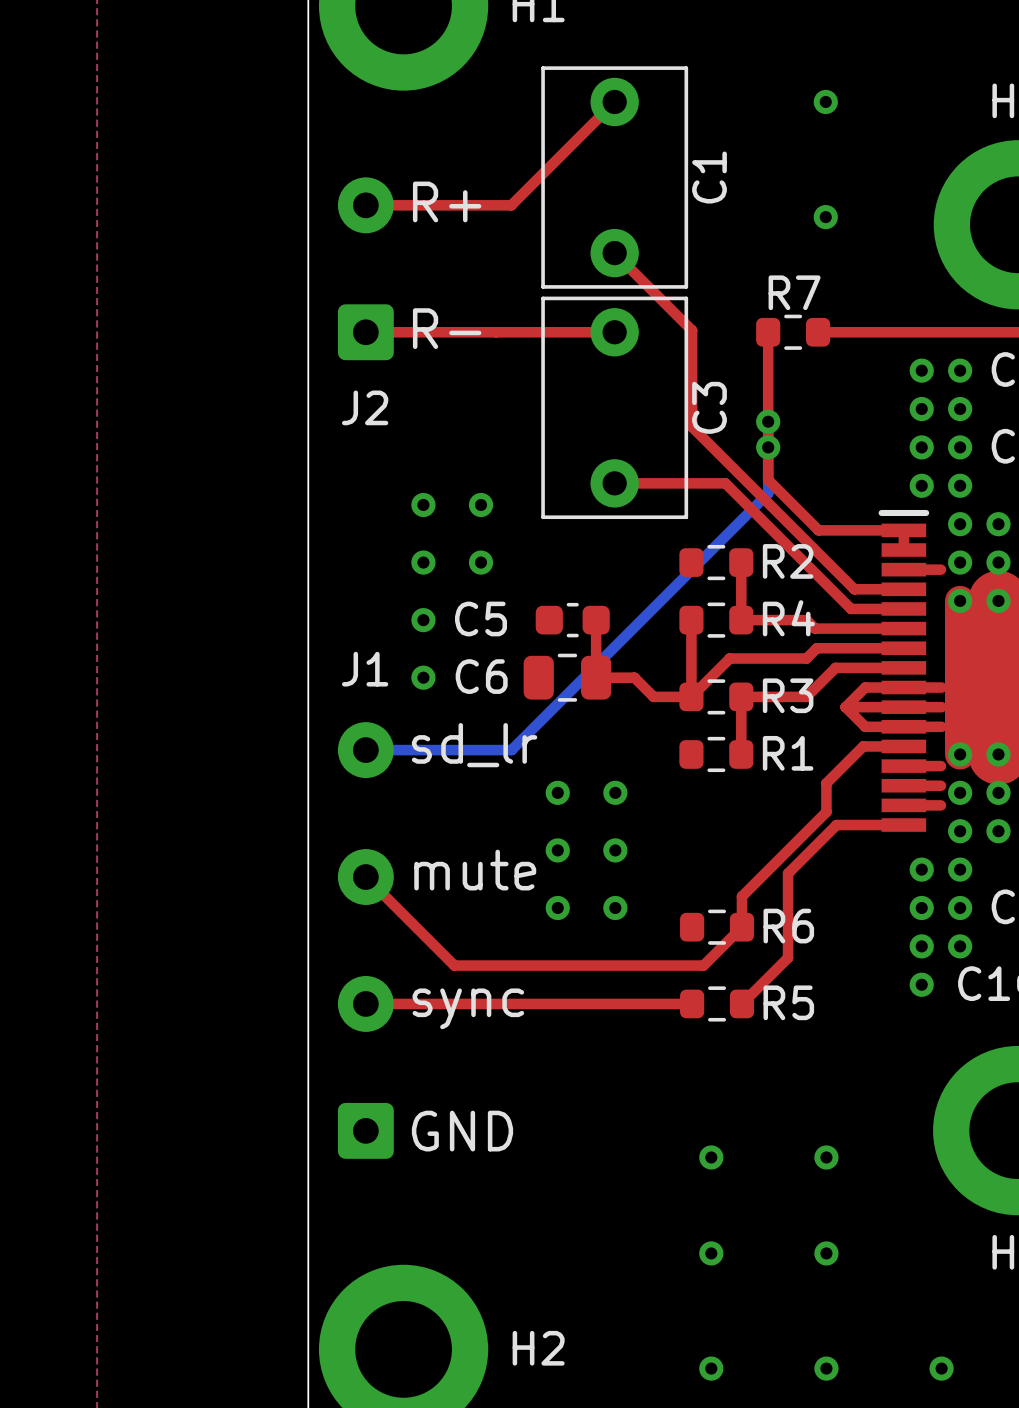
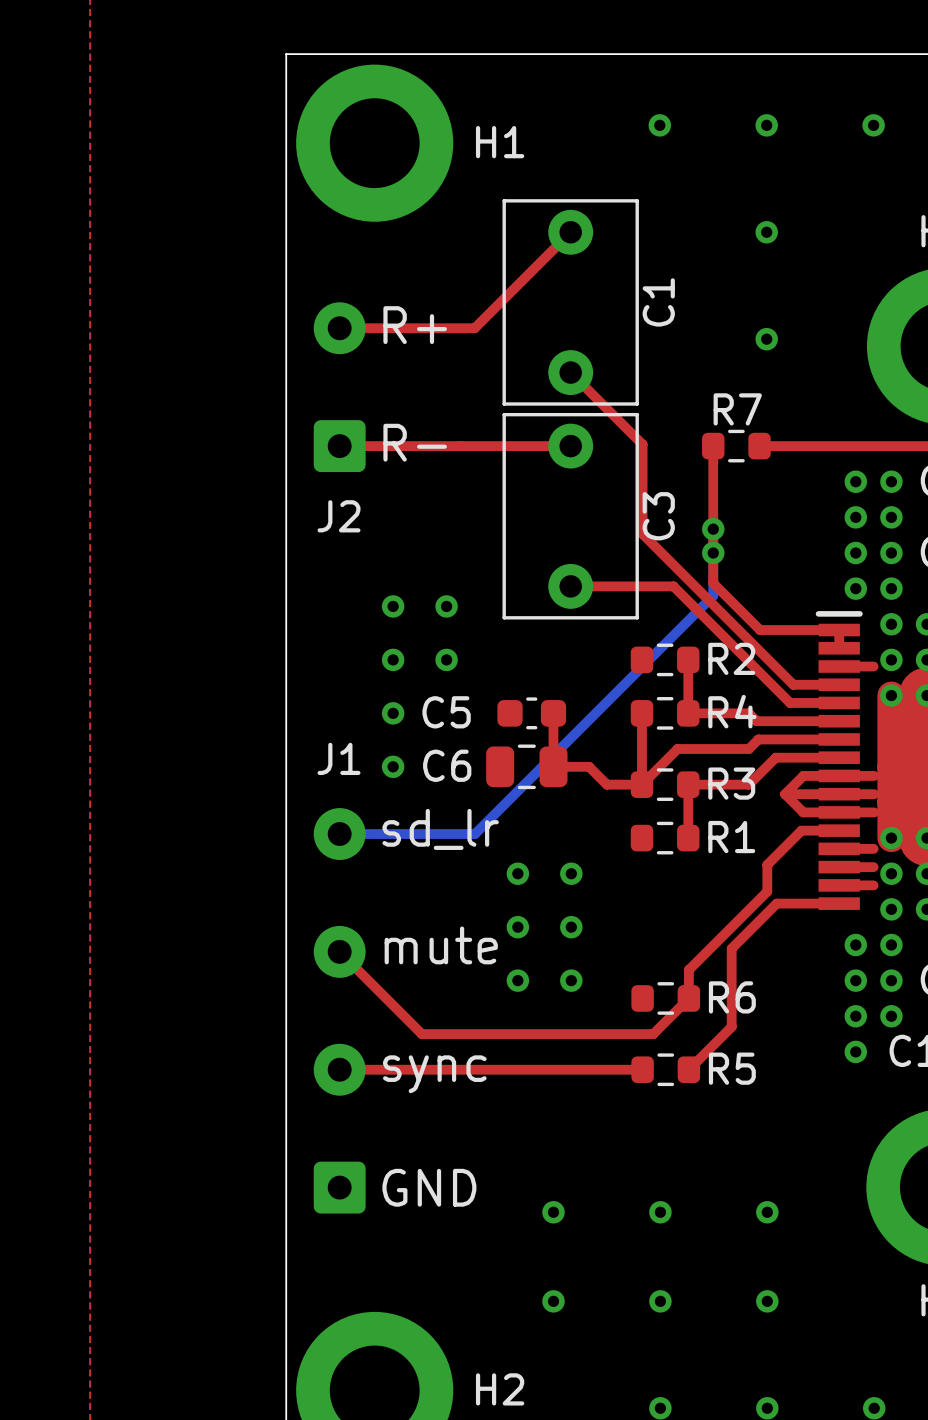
via: none -> (553, 1212)
via: none -> (553, 1301)

